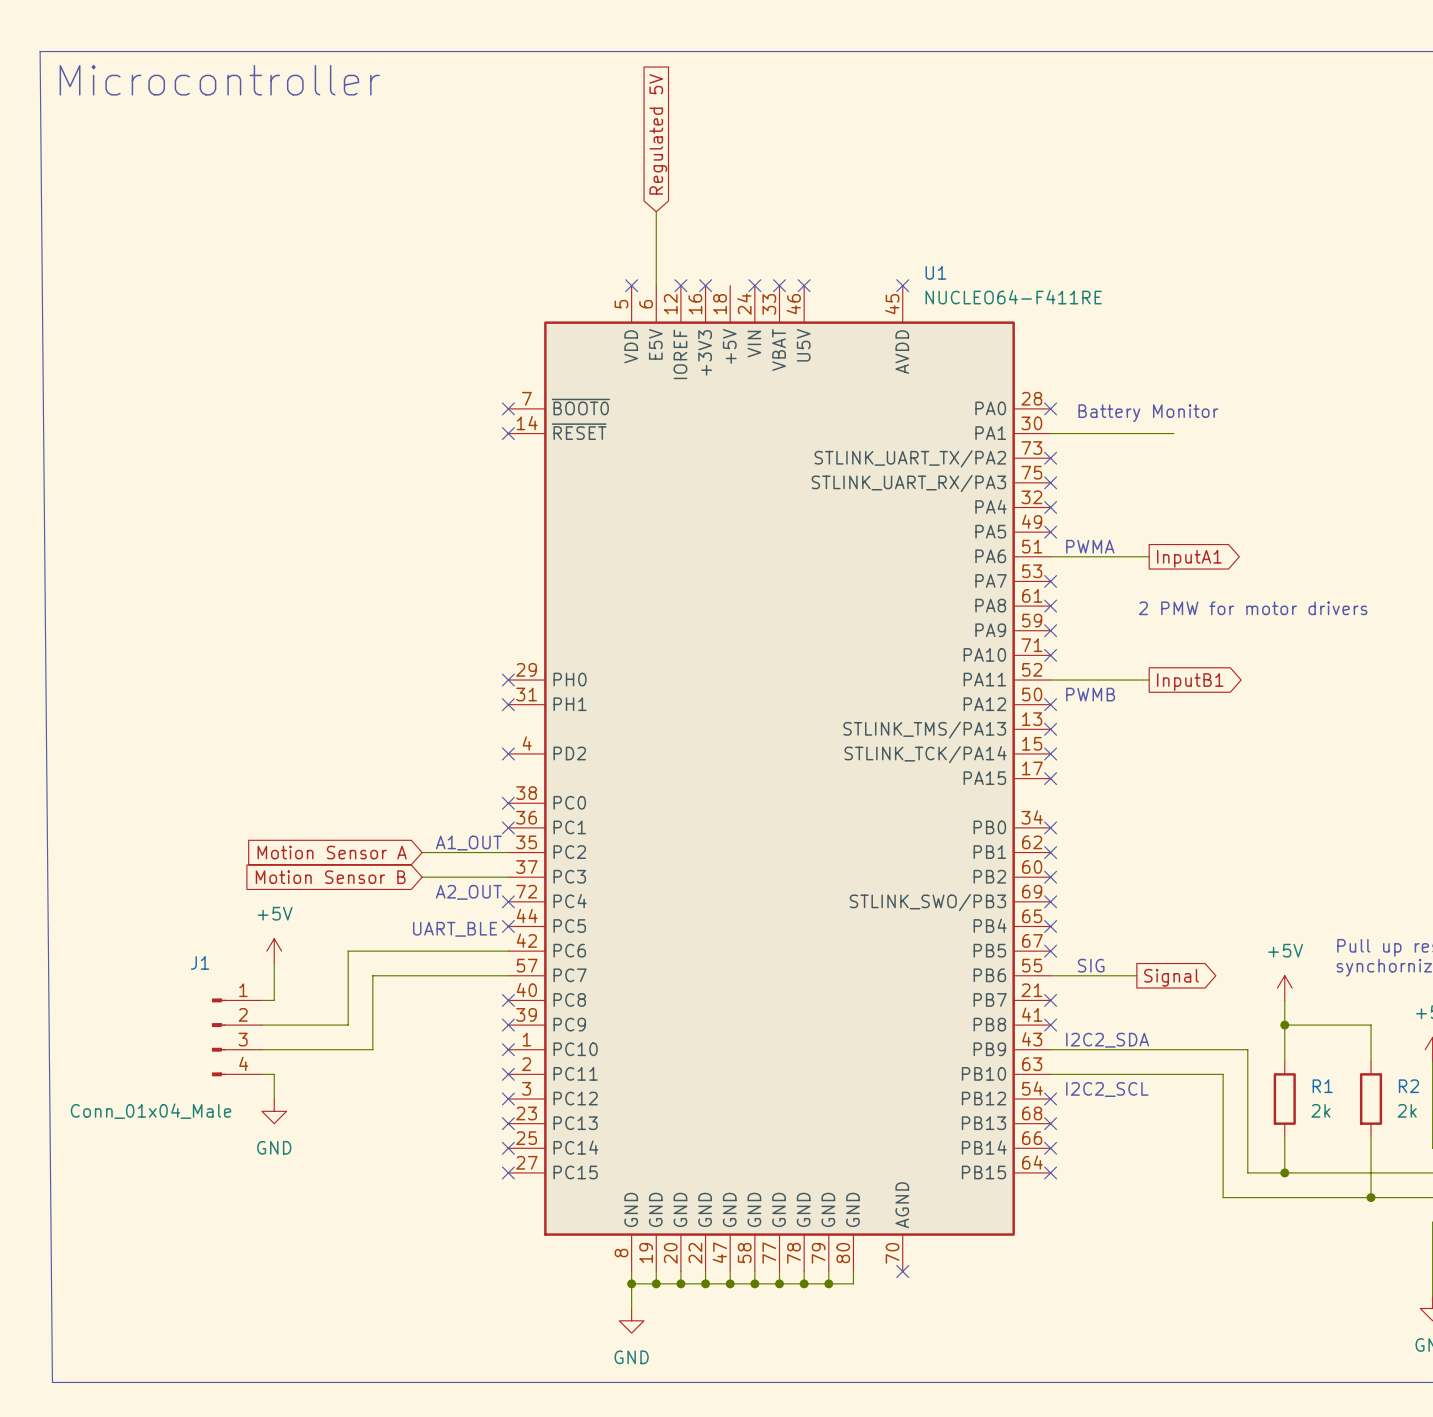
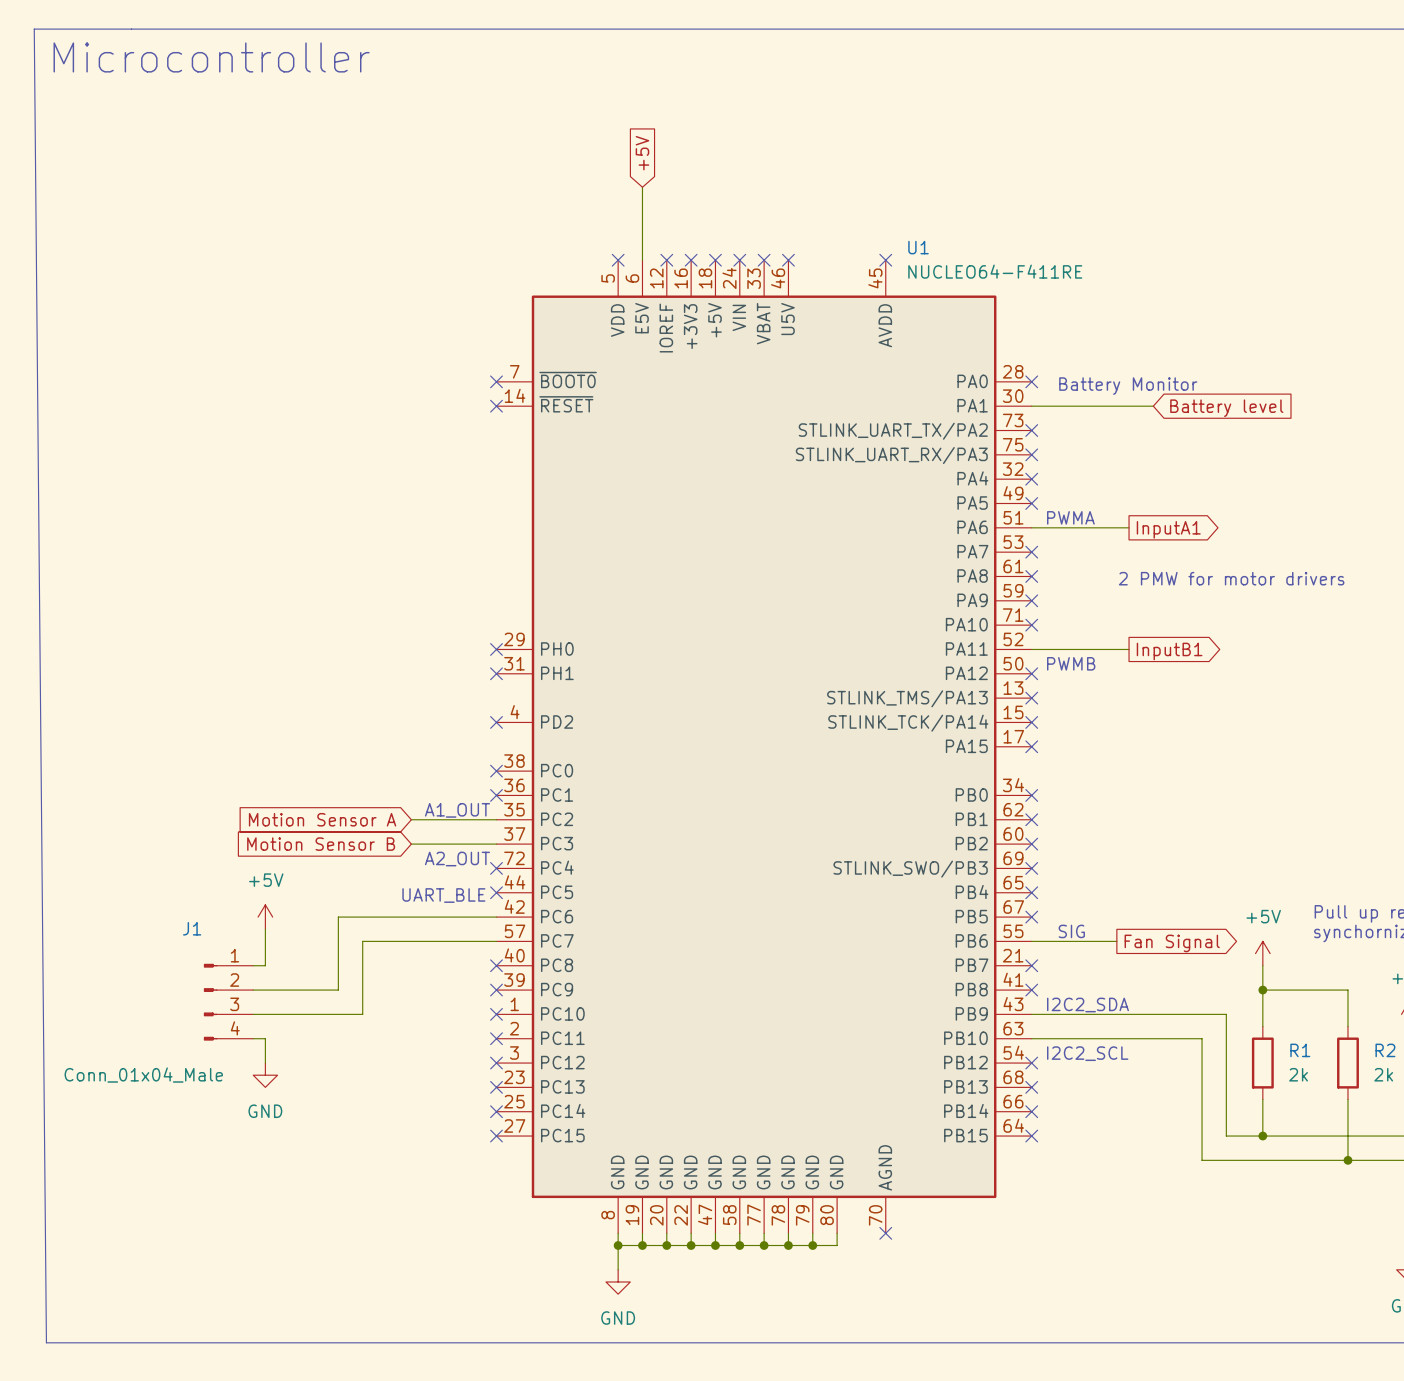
global label: Regulated 5V (658, 134) -> +5V (642, 153)
no-connect mark: none -> (715, 260)
global label: none -> Battery level (1226, 408)
global label: Signal (1171, 977) -> Fan Signal (1172, 943)

